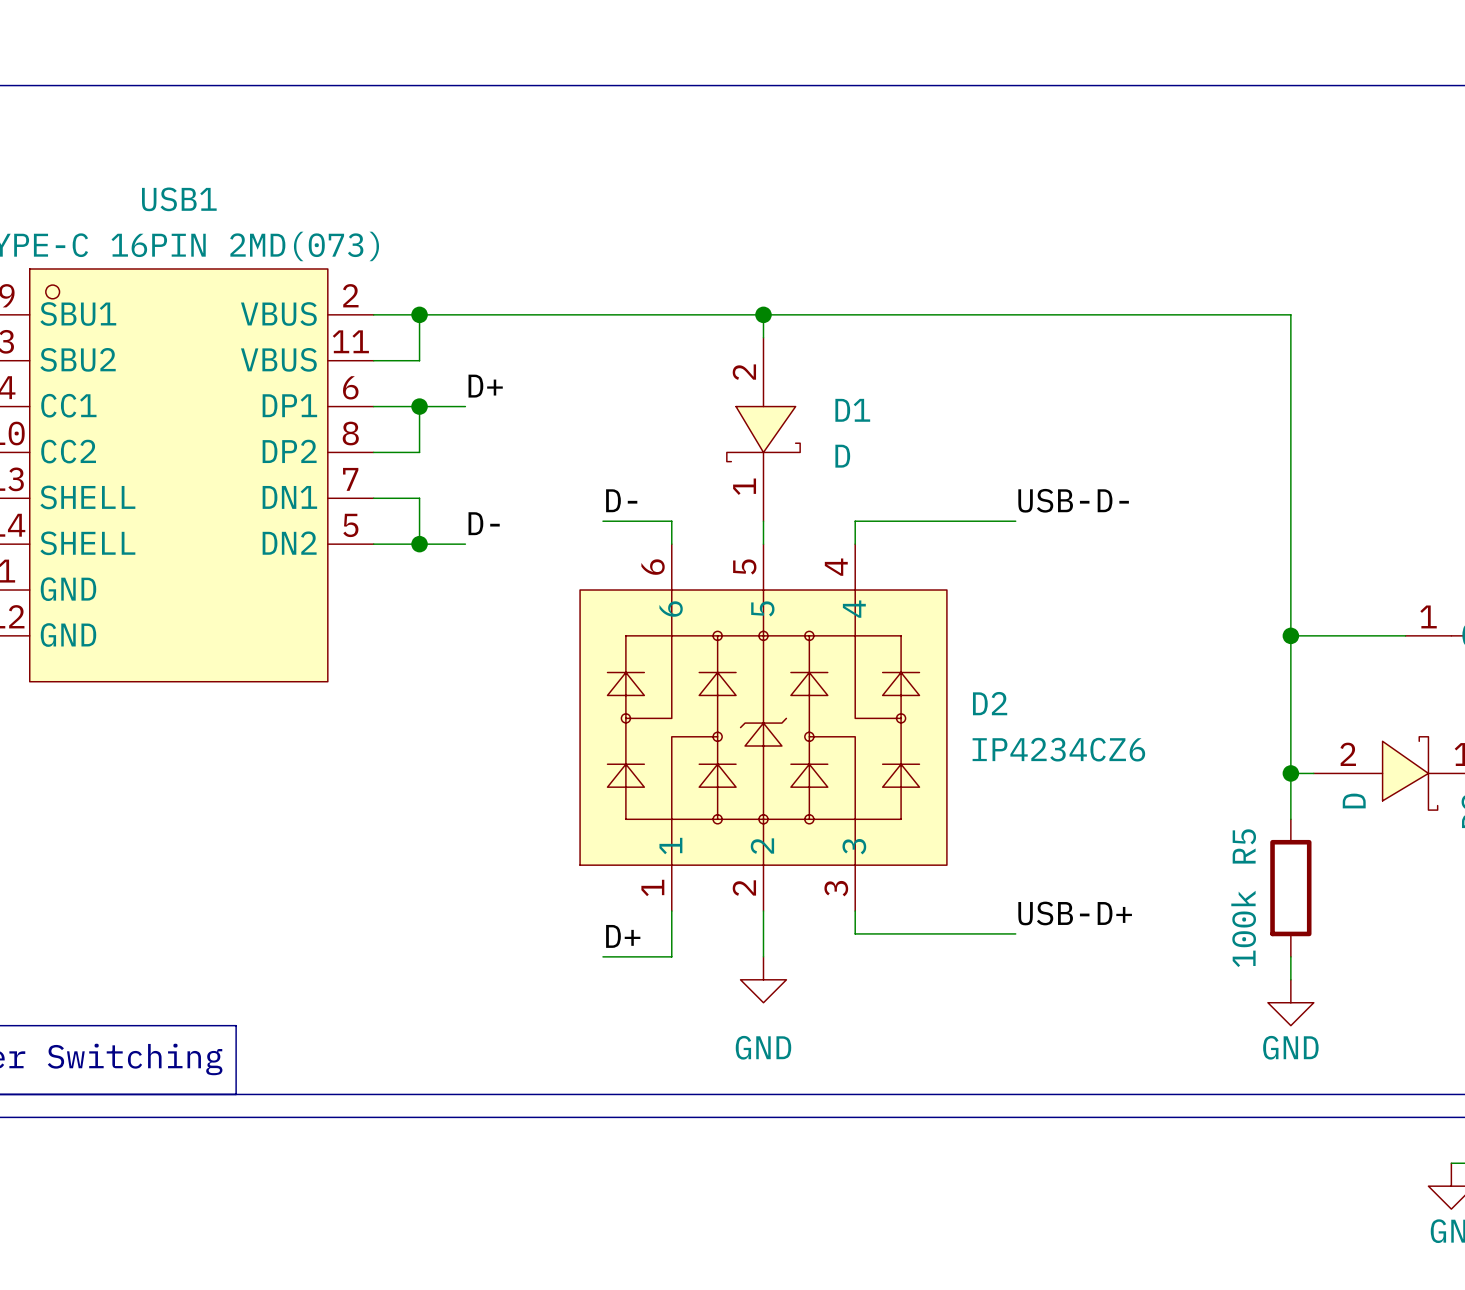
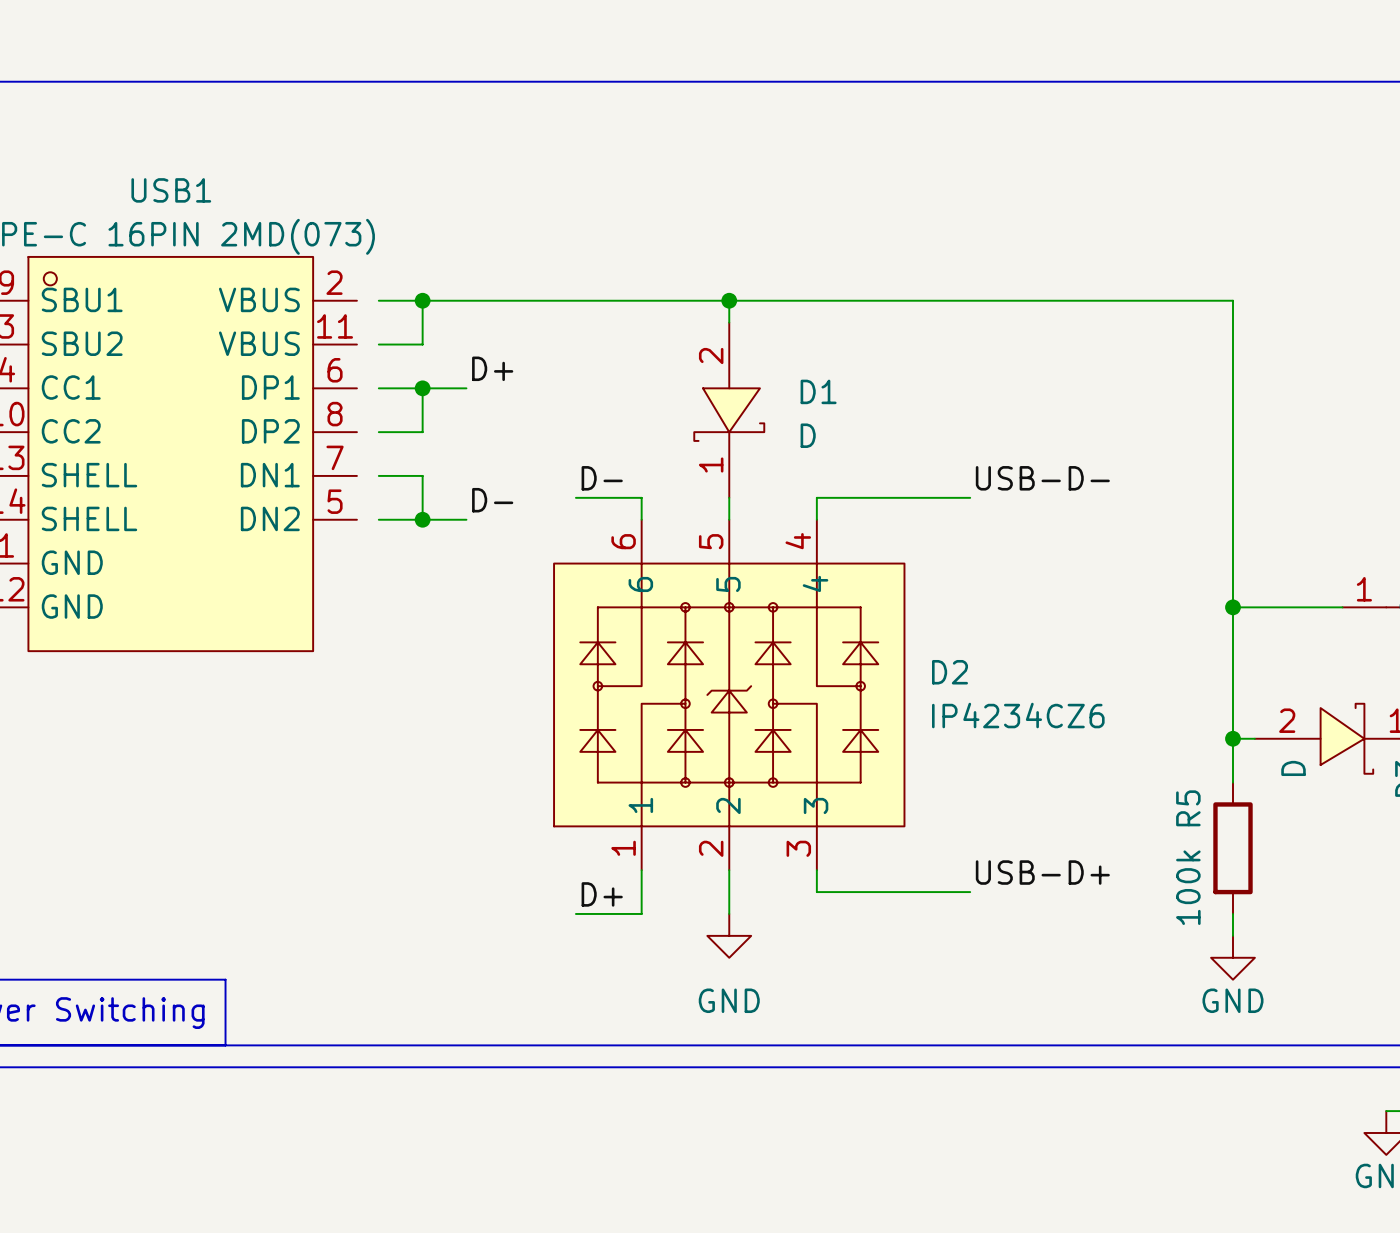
wire: (373, 314) (396, 314) -> none
wire: (419, 314) (419, 360) -> (422, 300) (422, 344) (400, 344)
junction position: (419, 314) -> (422, 300)
wire: (373, 360) (396, 360) -> none
label position: D+ (485, 386) -> D+ (492, 368)
wire: (373, 406) (396, 406) -> (444, 388) (466, 388)
wire: (419, 406) (419, 452) -> (422, 388) (422, 432) (400, 432)
junction position: (419, 406) -> (422, 388)
wire: (373, 452) (396, 452) -> none
wire: (373, 498) (396, 498) -> none
wire: (419, 498) (419, 544) -> (400, 475) (422, 475) (422, 519)
label position: D- (484, 523) -> D- (492, 500)
wire: (373, 544) (396, 544) -> (444, 519) (466, 519)
junction position: (419, 544) -> (422, 519)

